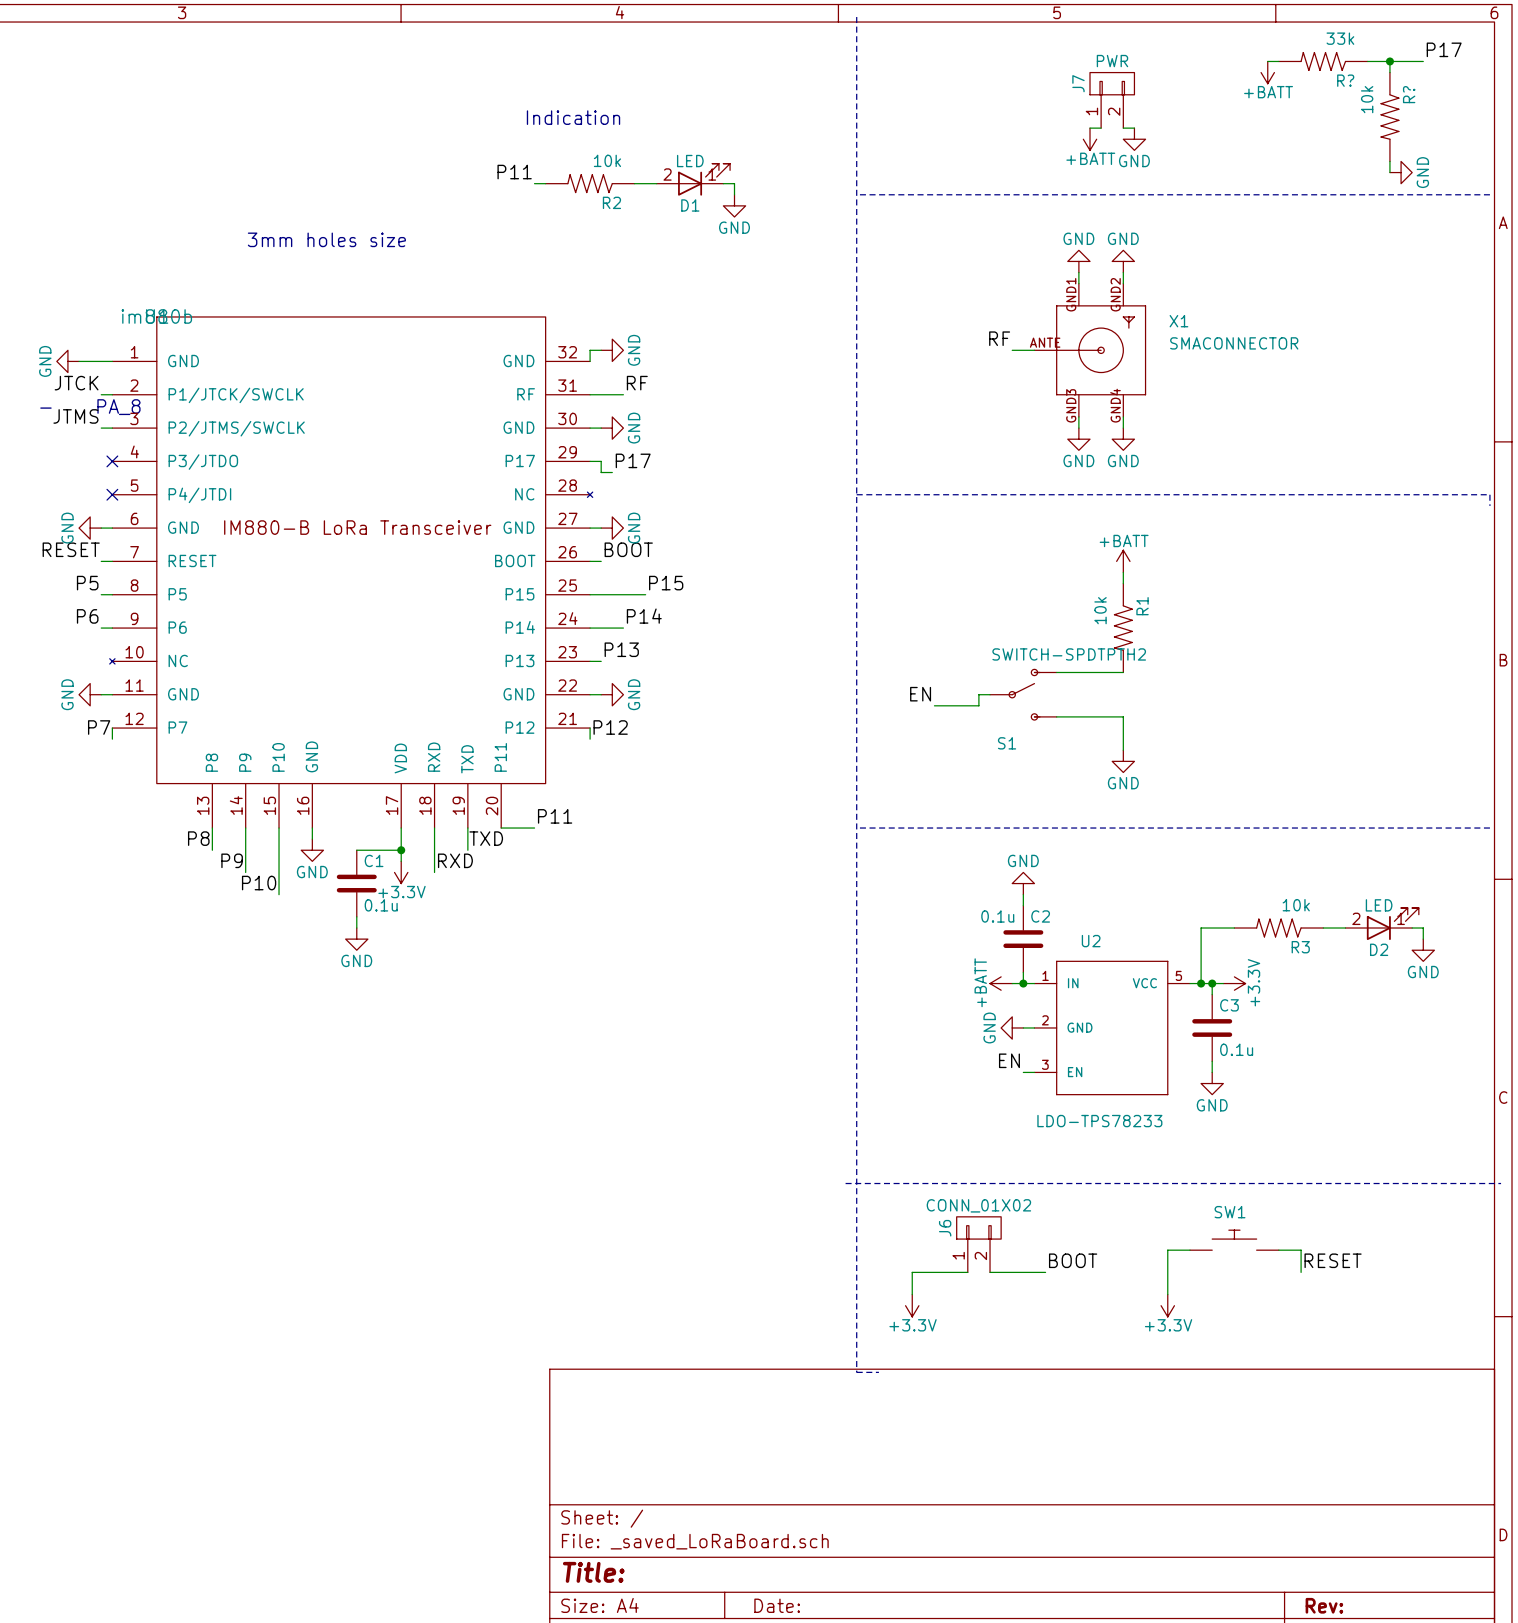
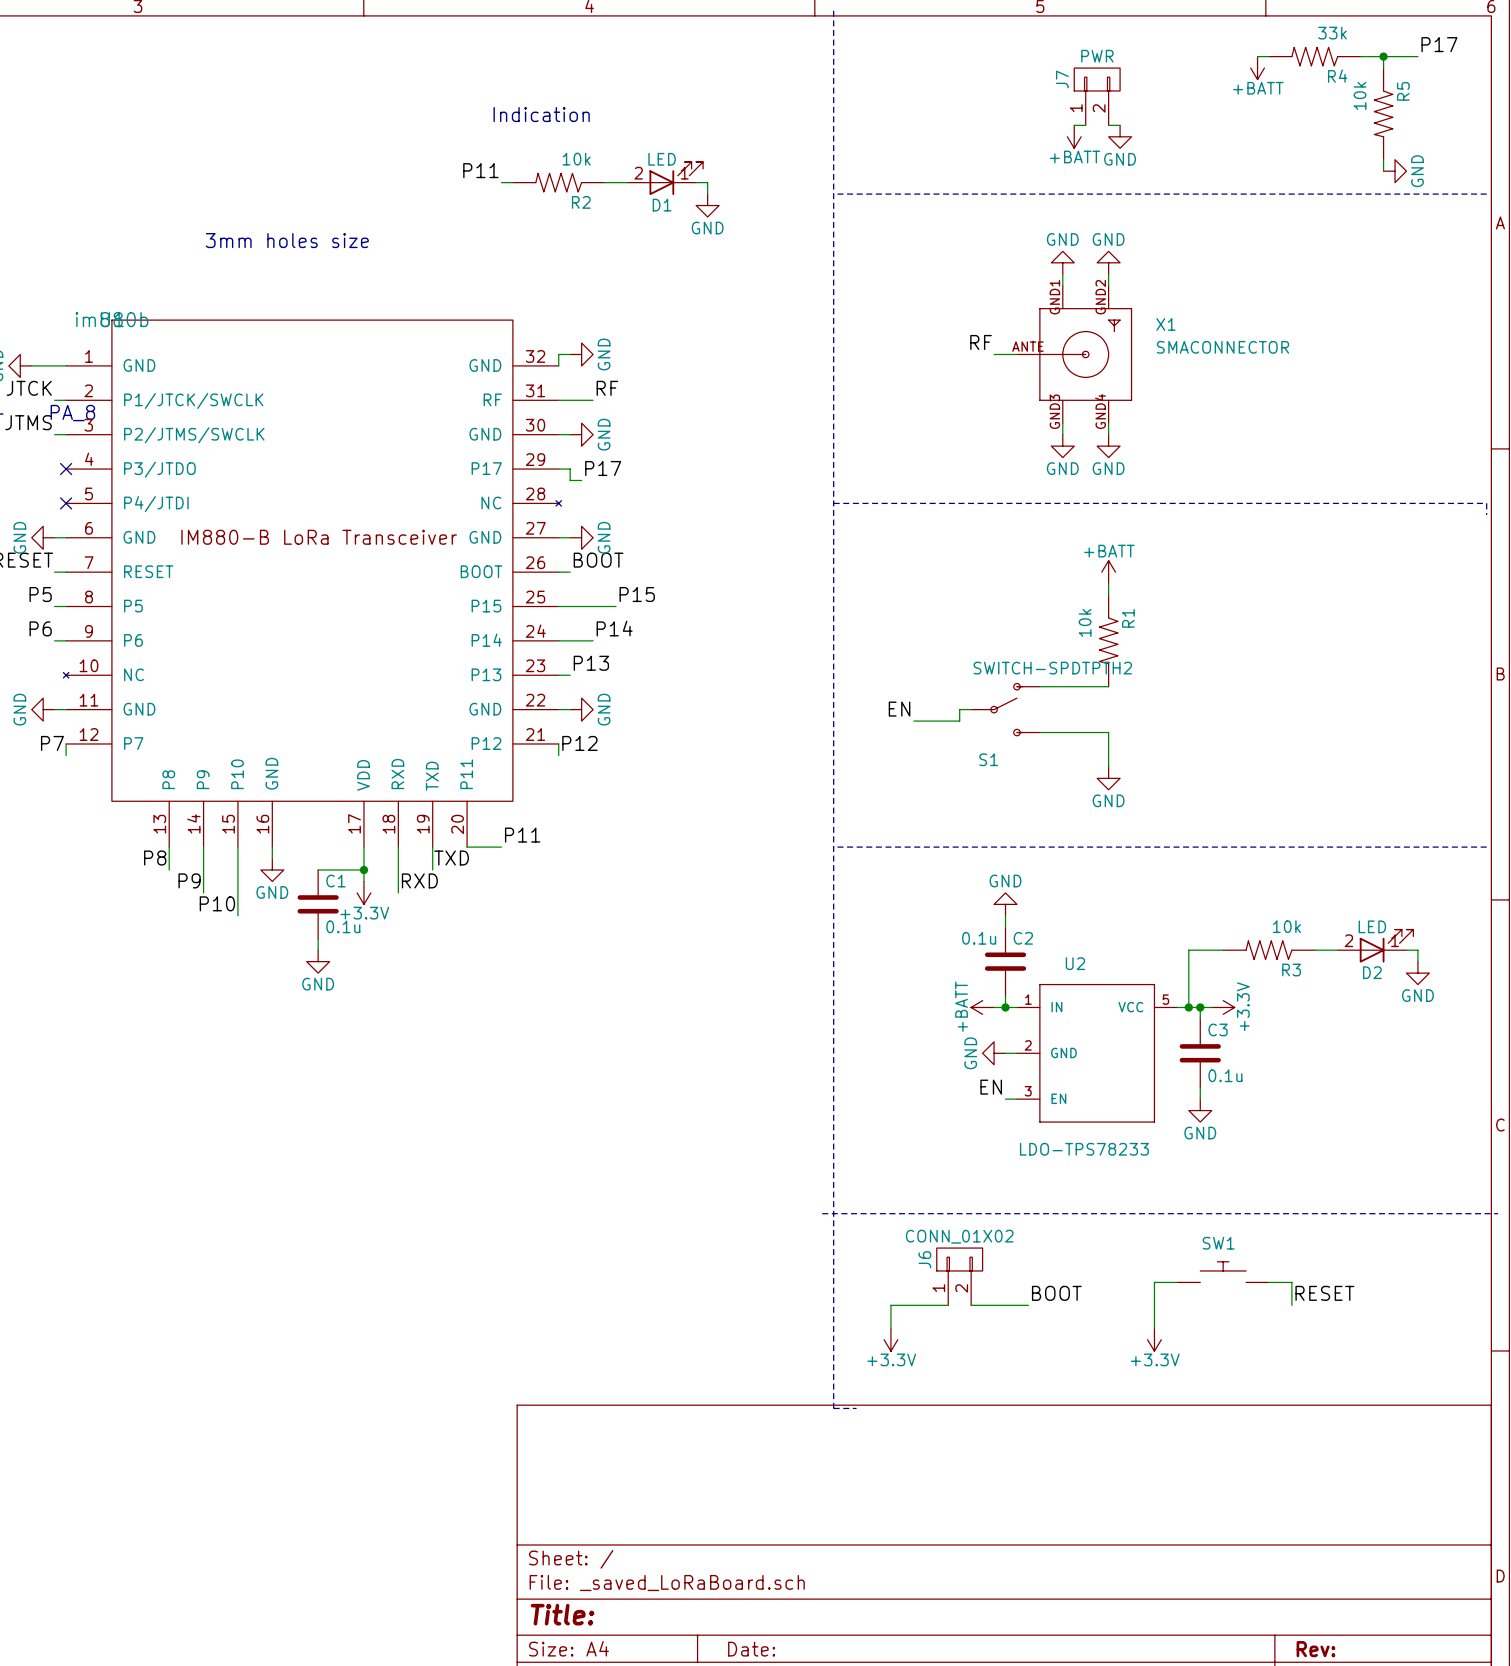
R? name: R? (1345, 80) -> R4 (1337, 76)
R? name: R? (1409, 94) -> R5 (1403, 91)

